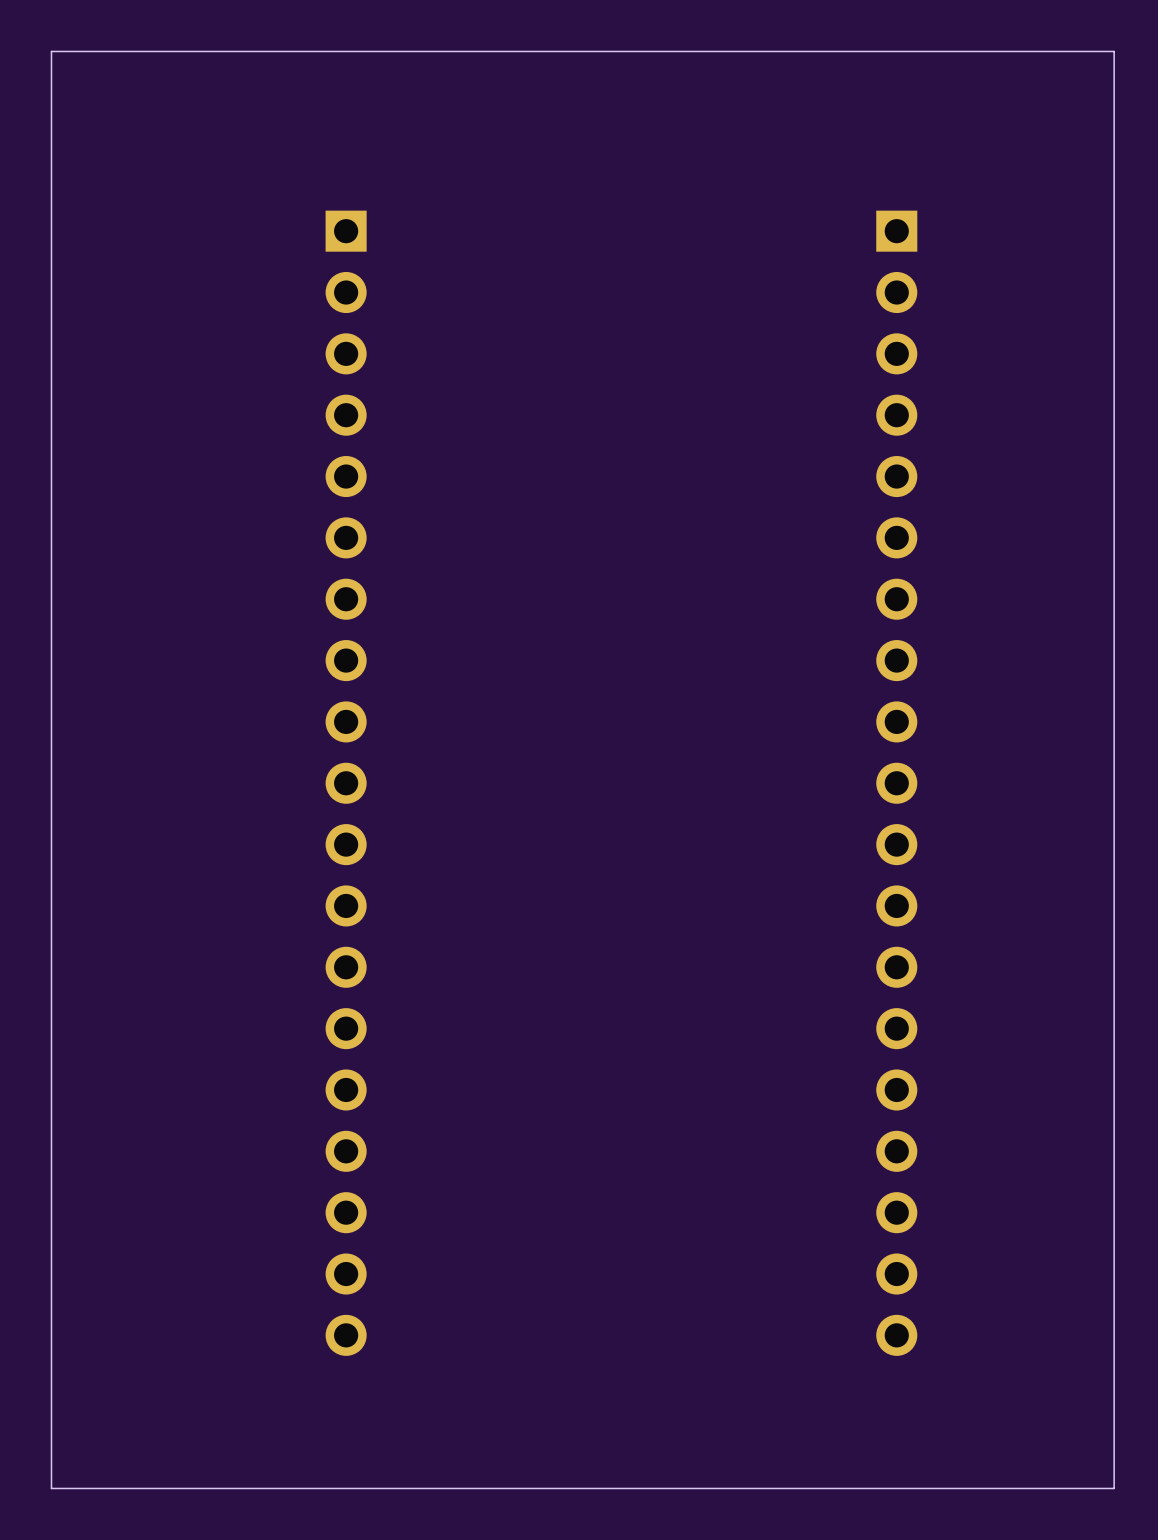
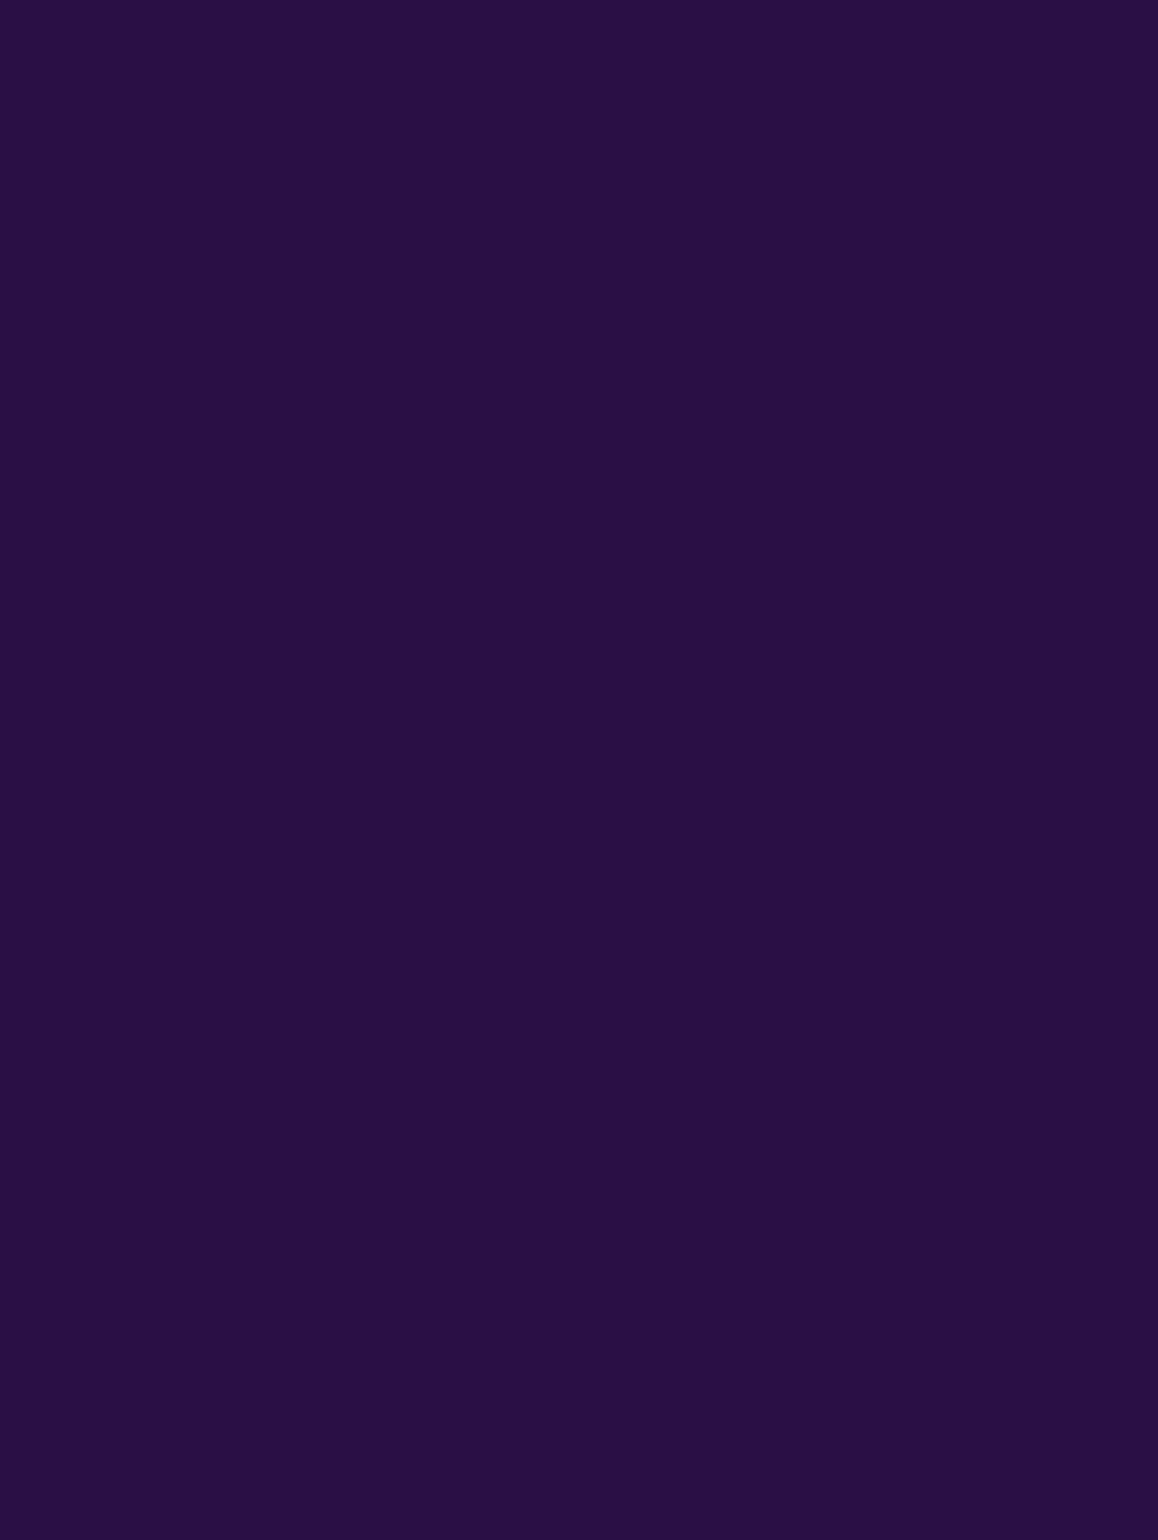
board edge: (1114, 51) (51, 51) (51, 1488) (1114, 1488) (1114, 51) -> none
part: (346, 783) -> none
part: (896, 783) -> none

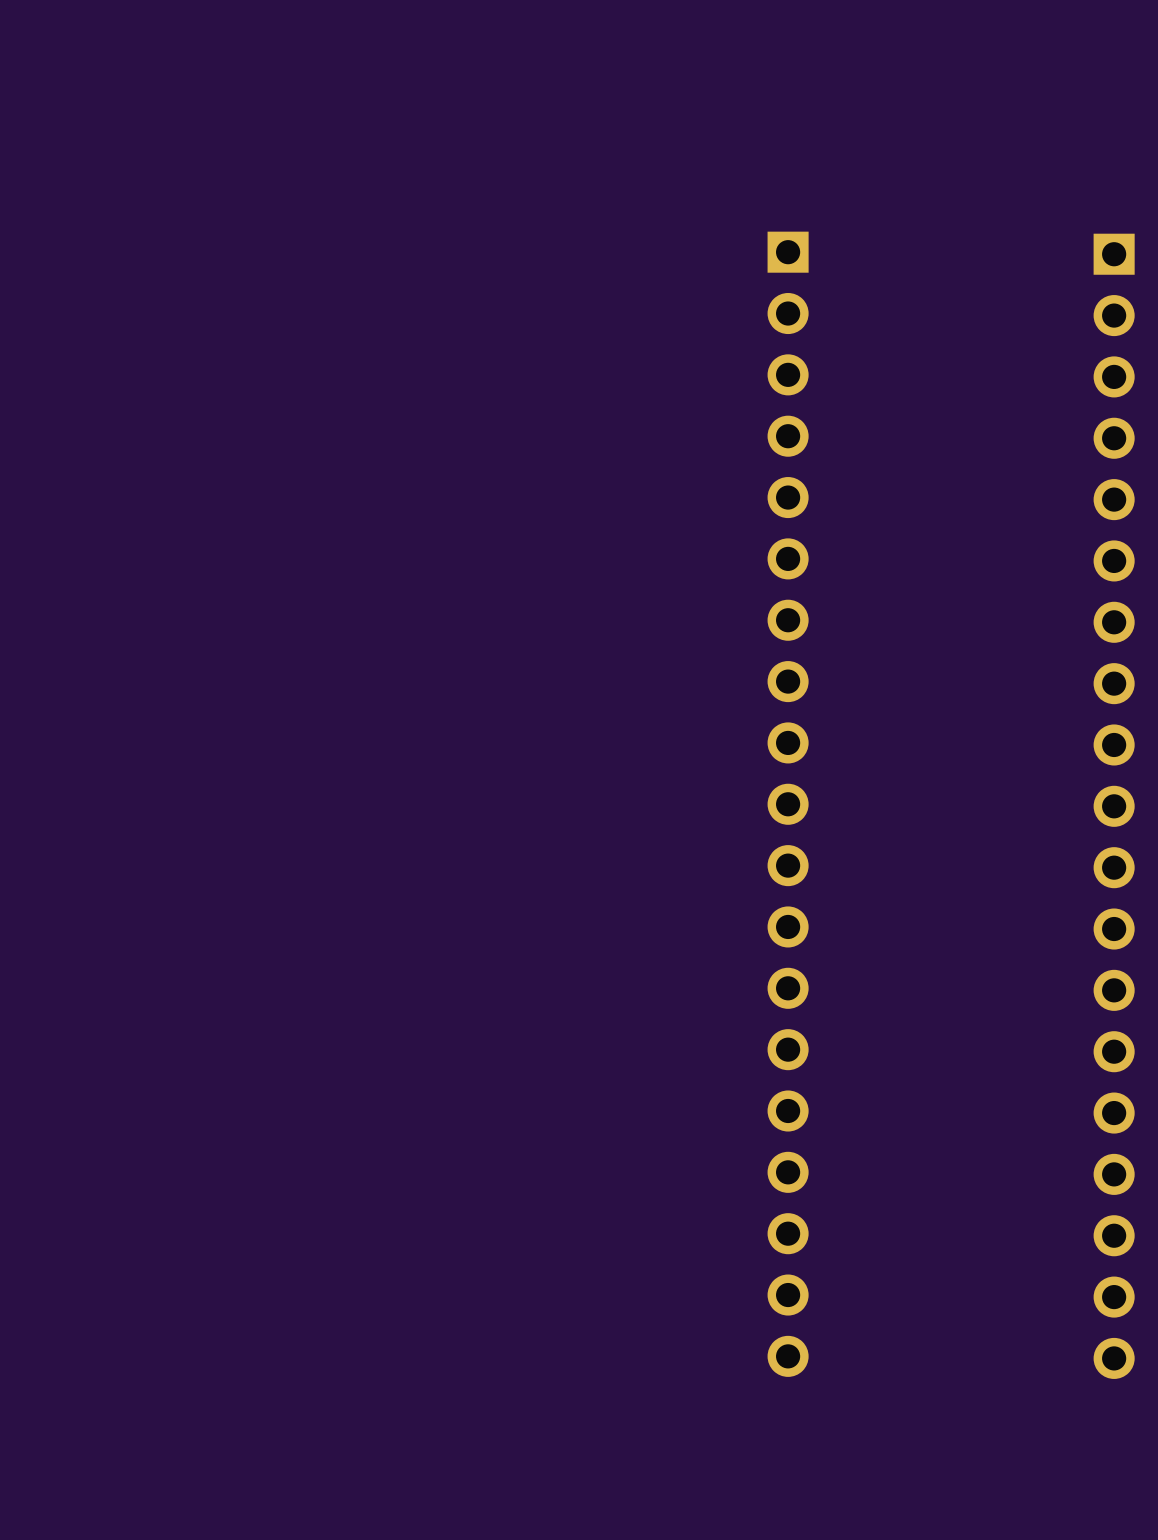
part: none -> (788, 804)
part: none -> (1114, 806)

